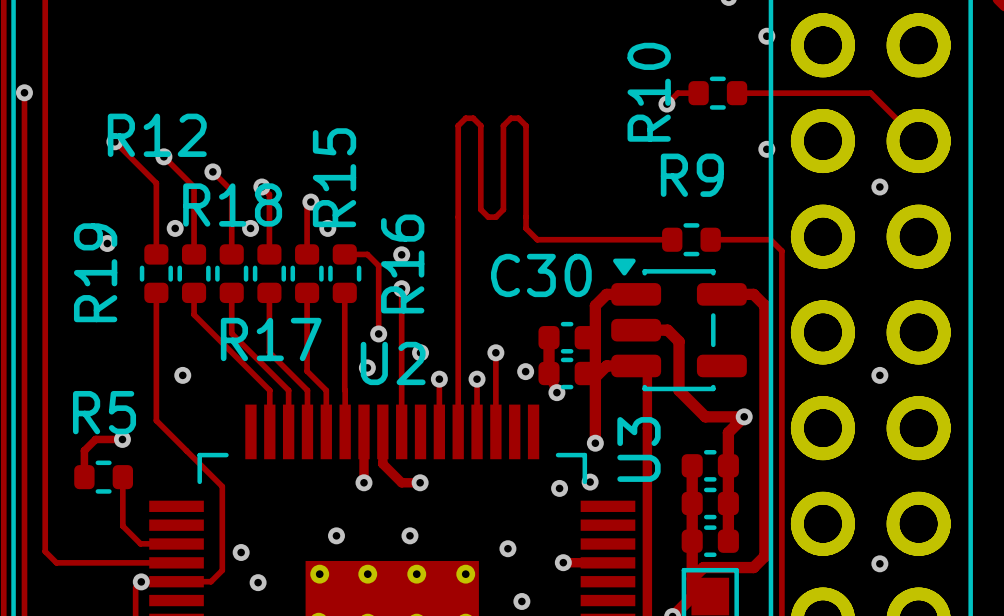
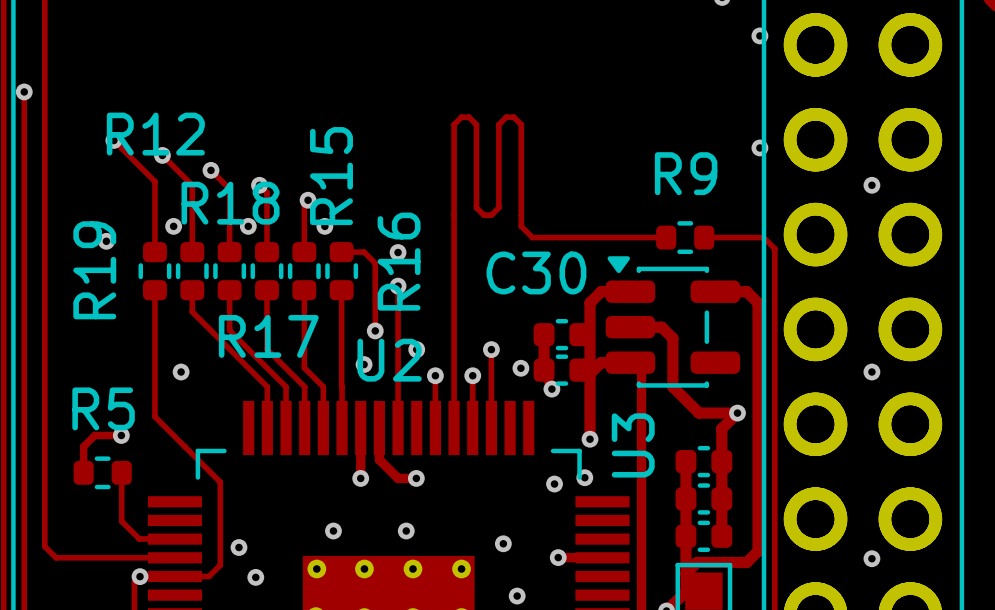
track: (698, 93) (677, 93) (666, 104) -> none
R10: (717, 93) -> none
track: (737, 93) (870, 93) (918, 141) -> none
via: (666, 104) -> none

